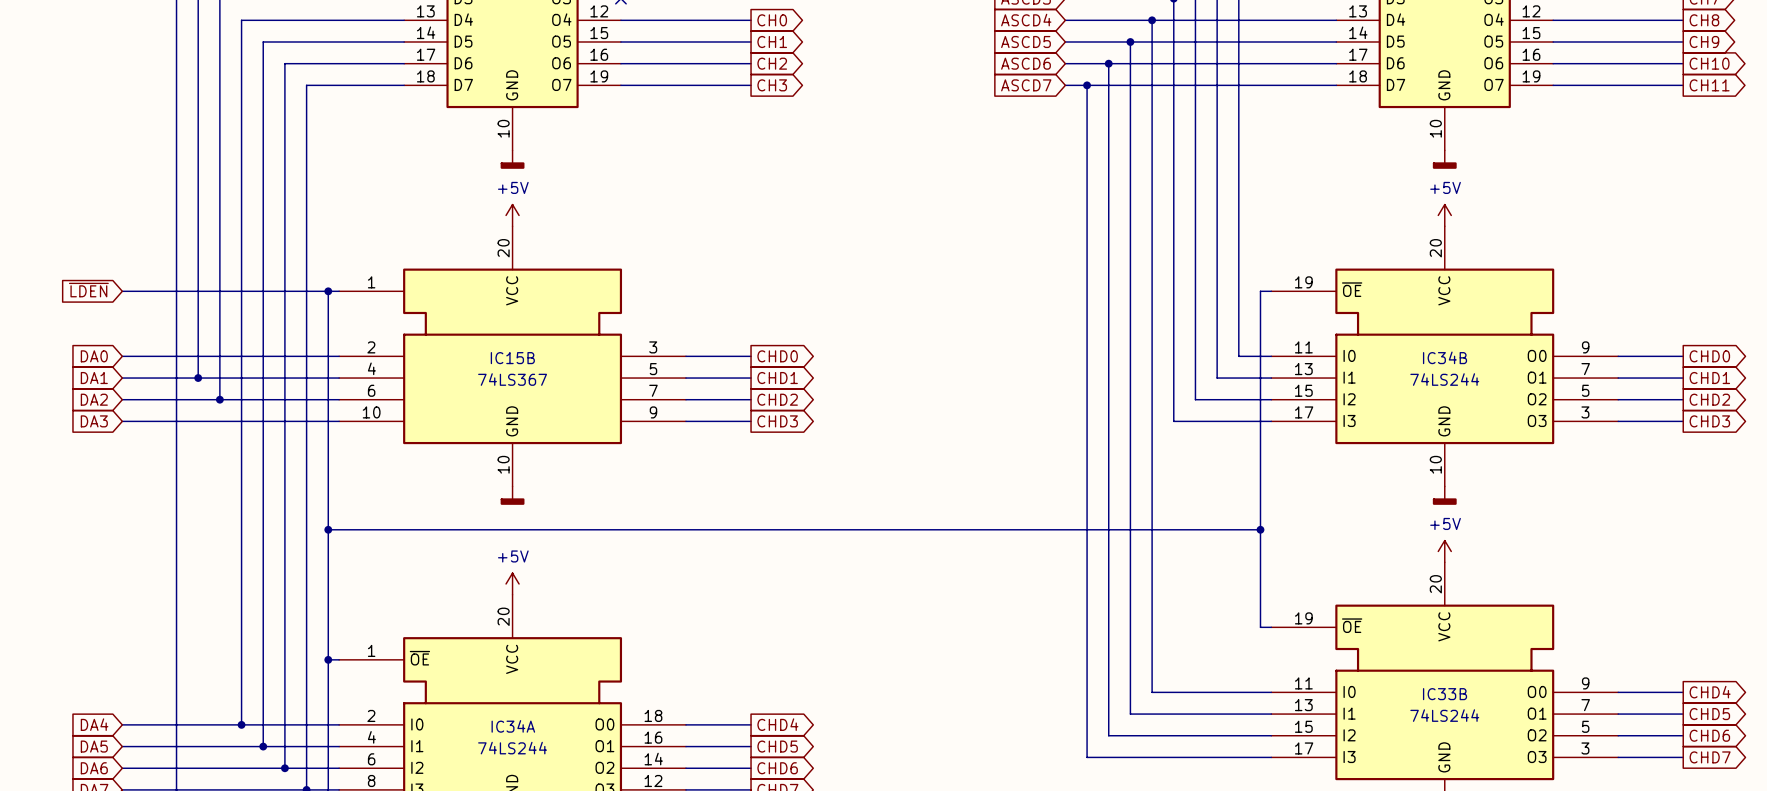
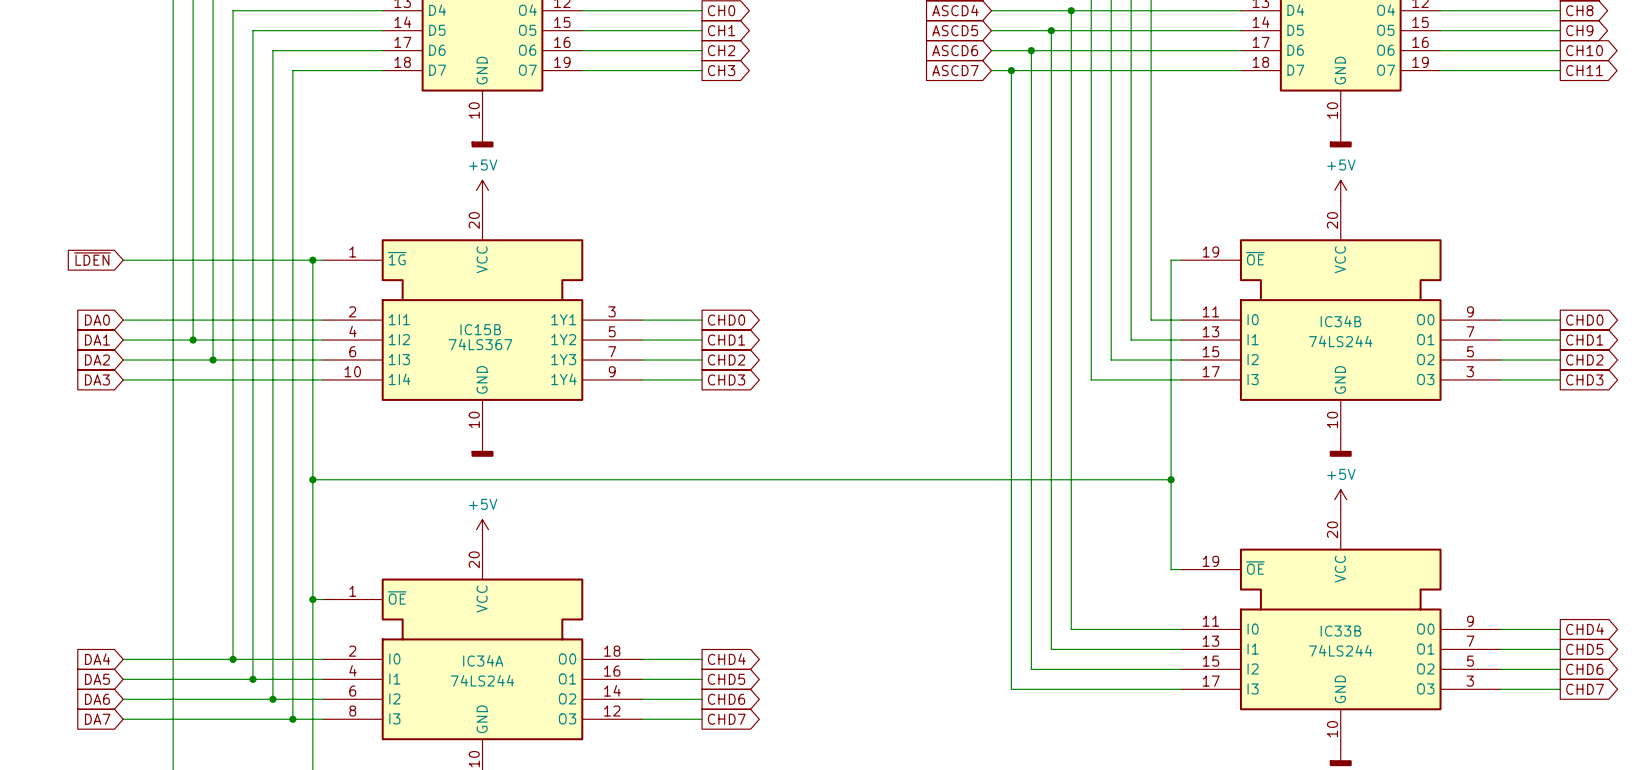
IC15B symbol: [339, 226, 686, 487] -> [322, 200, 643, 440]

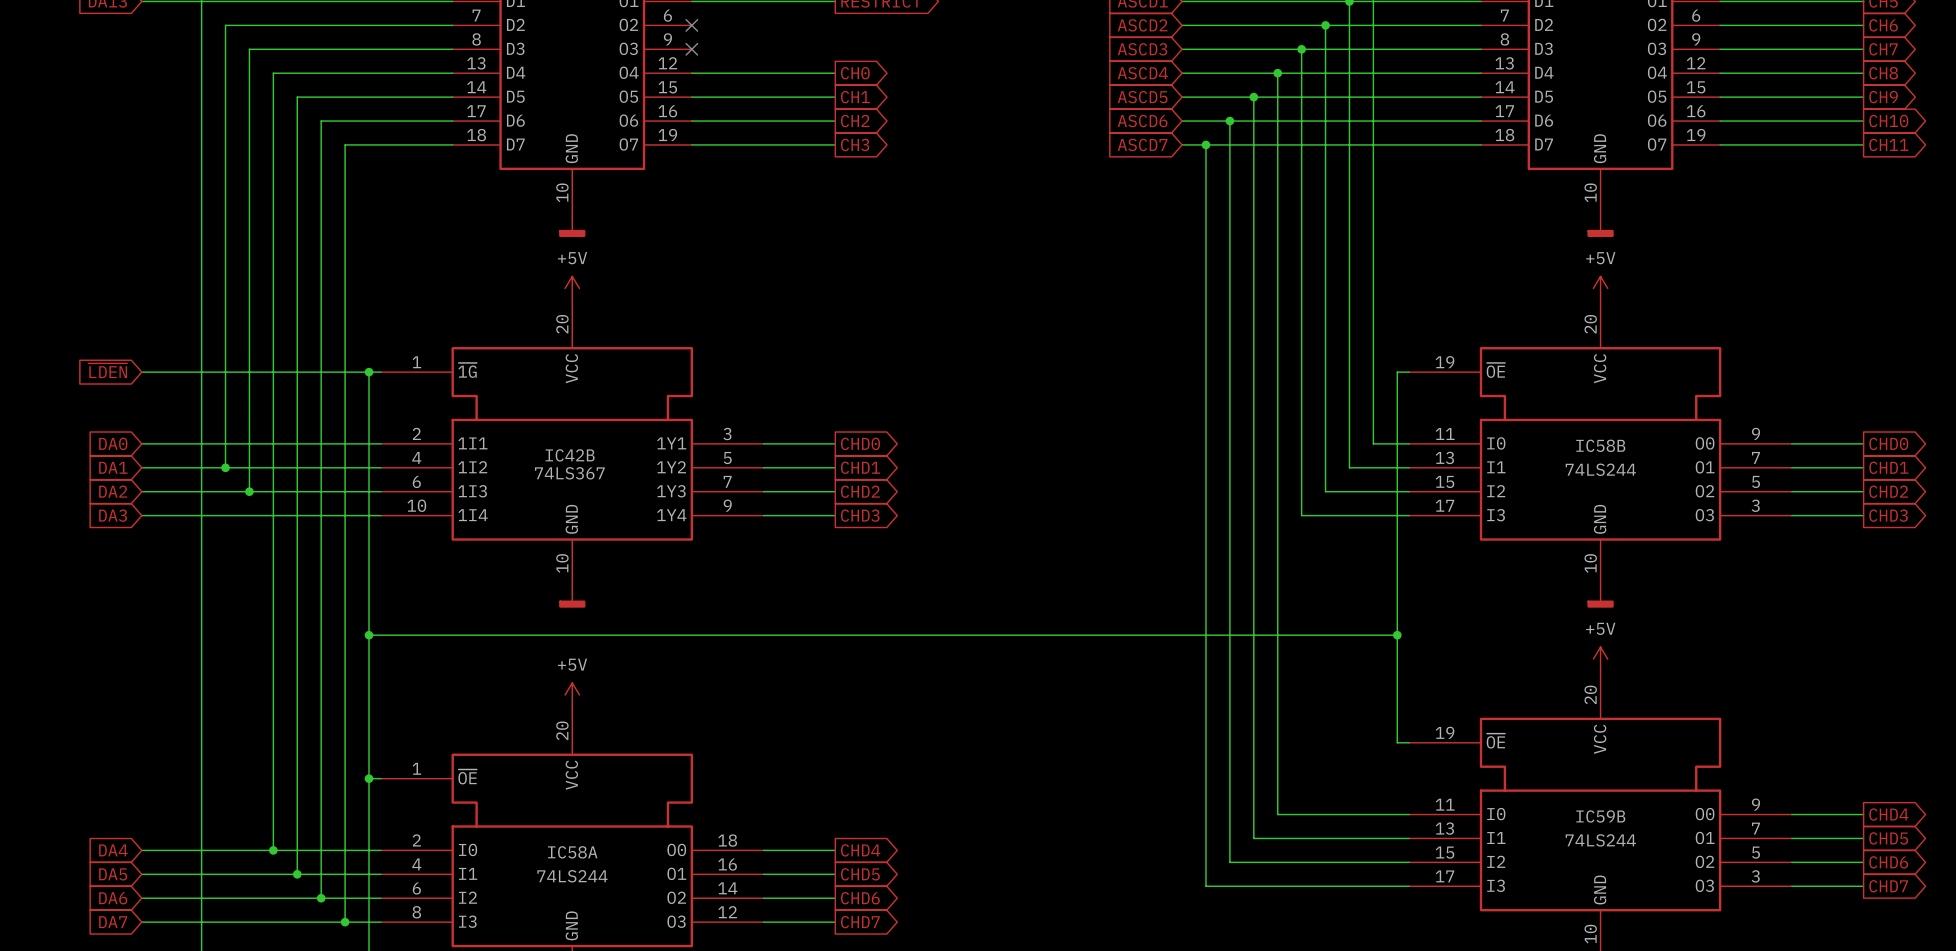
IC34B name: IC34B (1340, 321) -> IC58B (1600, 445)
IC15B name: IC15B (480, 329) -> IC42B (570, 455)
IC33B name: IC33B (1340, 631) -> IC59B (1600, 816)
IC34A name: IC34A (483, 660) -> IC58A (572, 852)

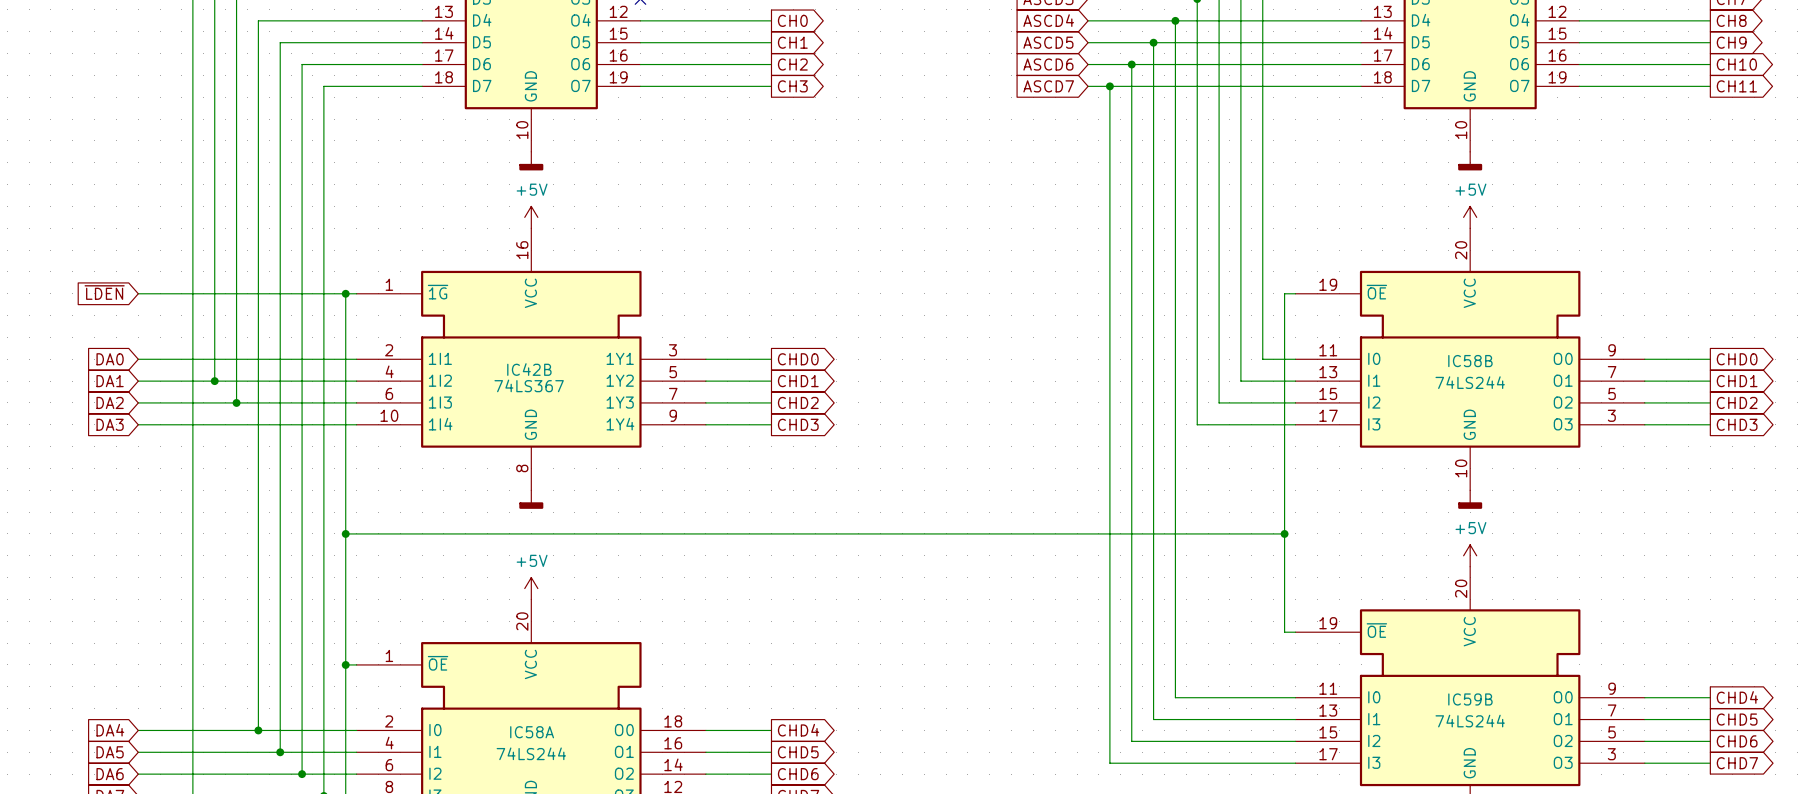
IC42B pin number: 20 (562, 324) -> 16 (522, 250)
IC42B pin number: 10 (562, 563) -> 8 (522, 468)

